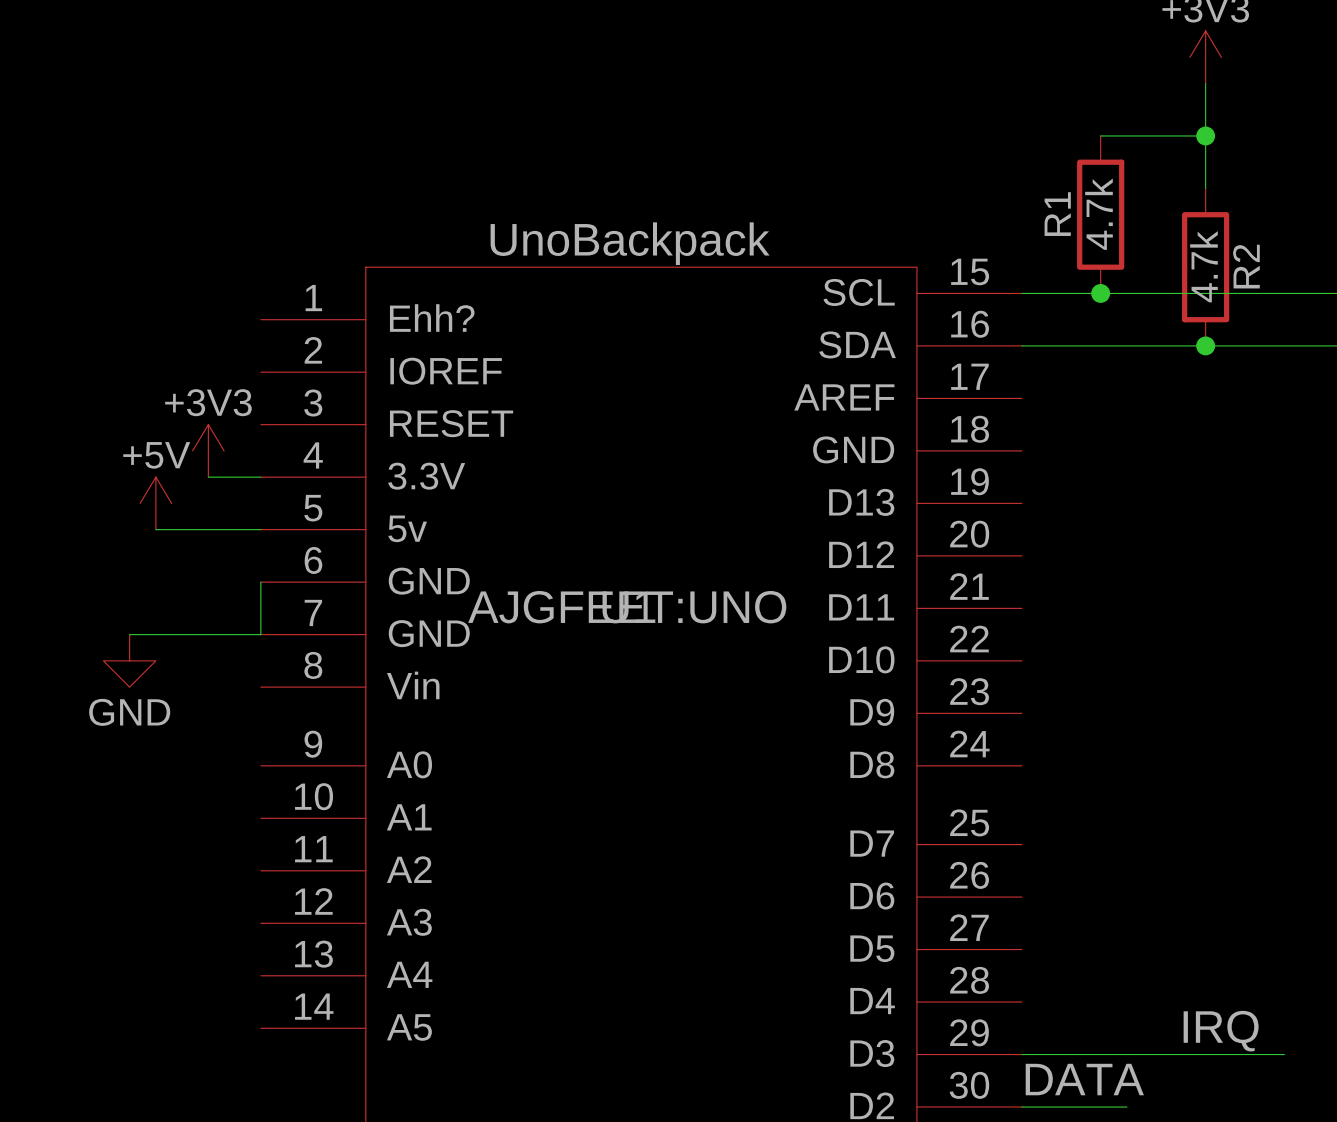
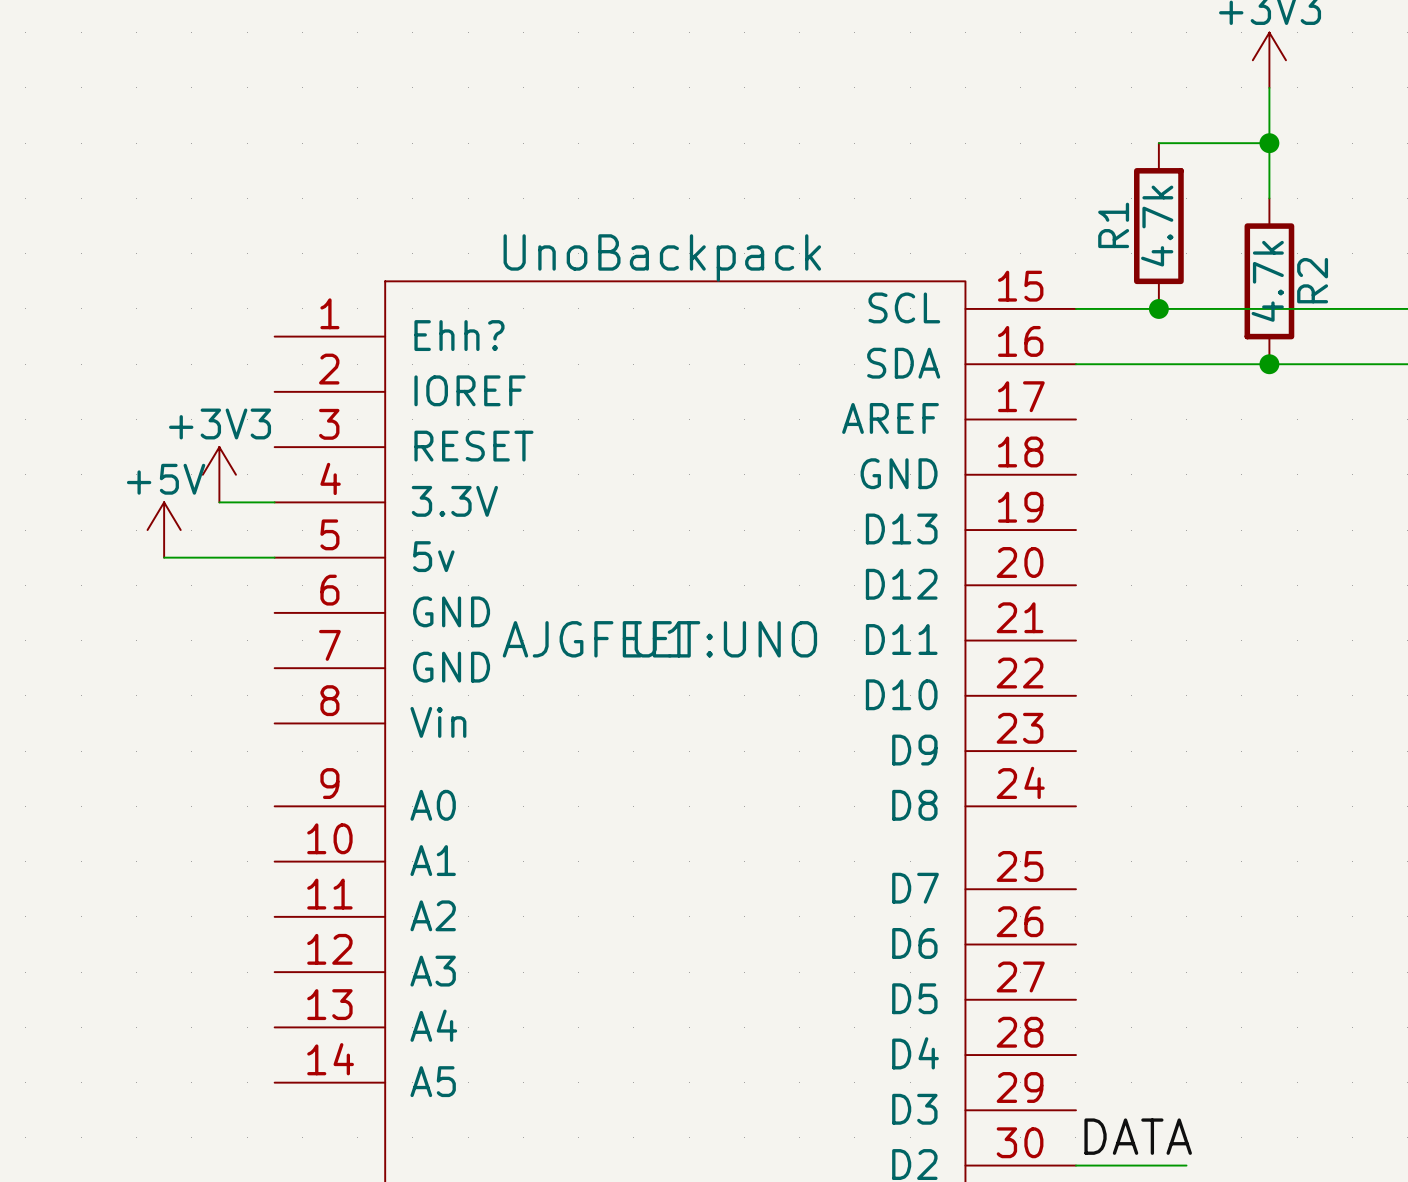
wire: (260, 582) (260, 634) (129, 634) -> none
power symbol: GND (129, 660) -> none
label: IRQ (1221, 1031) -> none
wire: (1021, 1054) (1284, 1054) -> none

